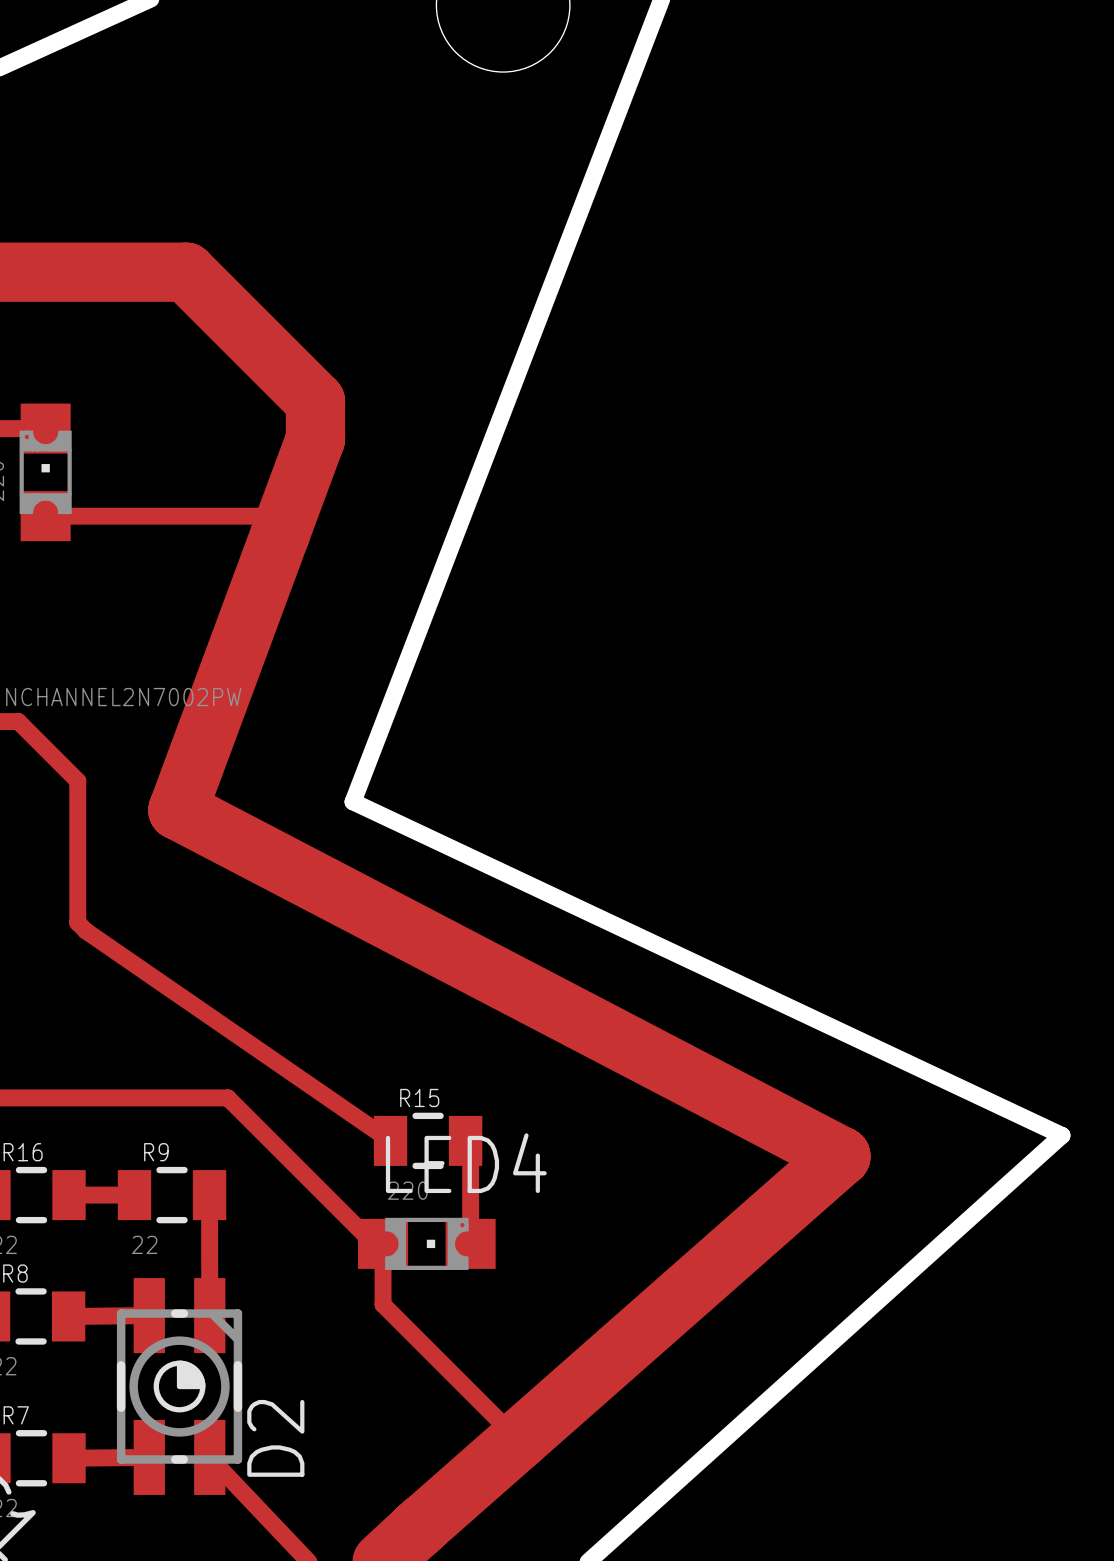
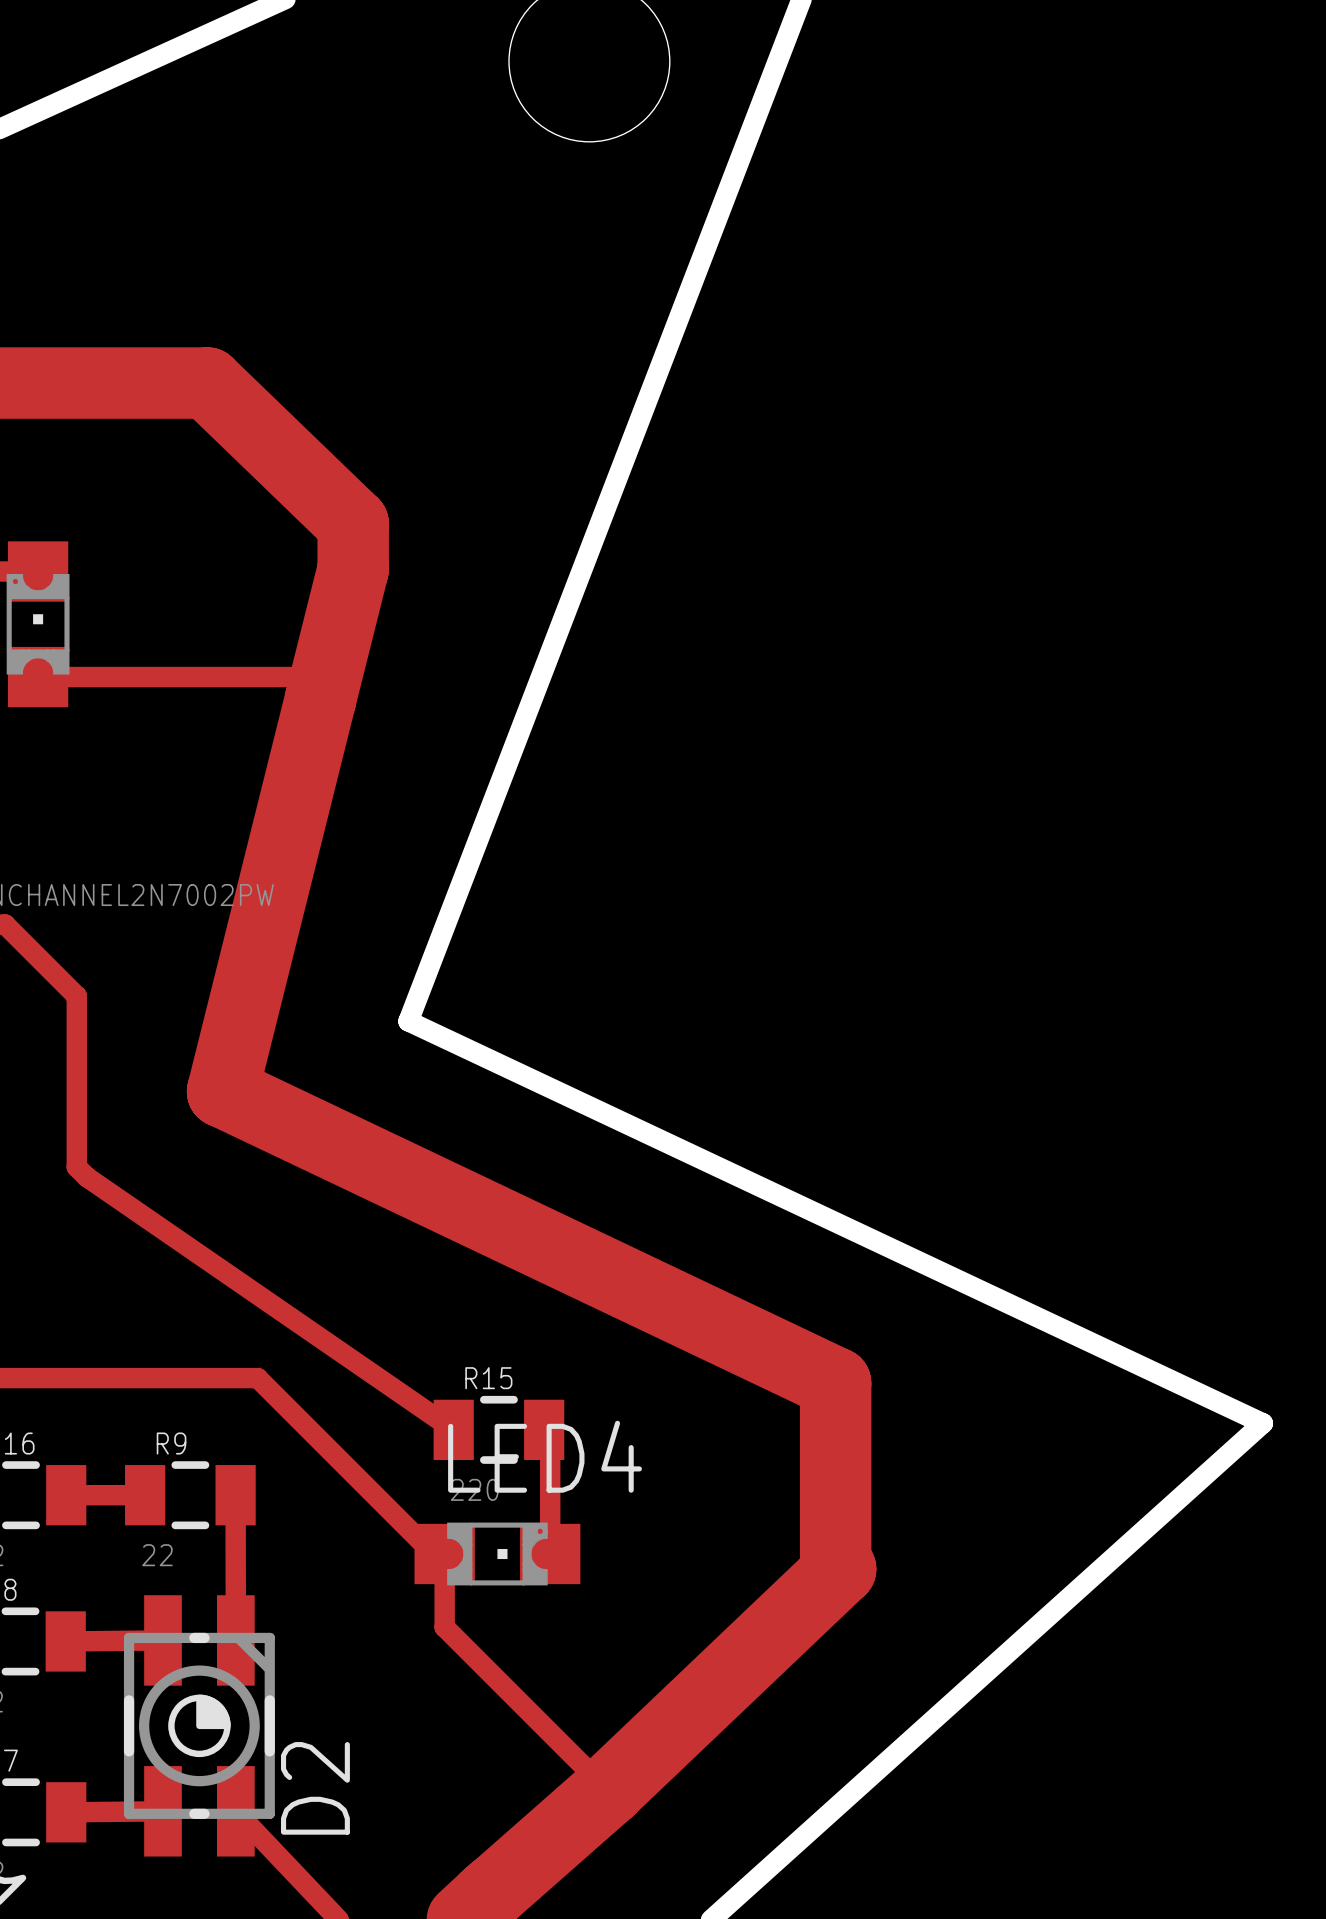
track: (186, 272) (315, 401) (315, 439) (177, 810) (840, 1156) (518, 1440) -> (207, 383) (353, 523) (353, 569) (222, 1091) (835, 1383) (835, 1564) (840, 1569) (608, 1790)

